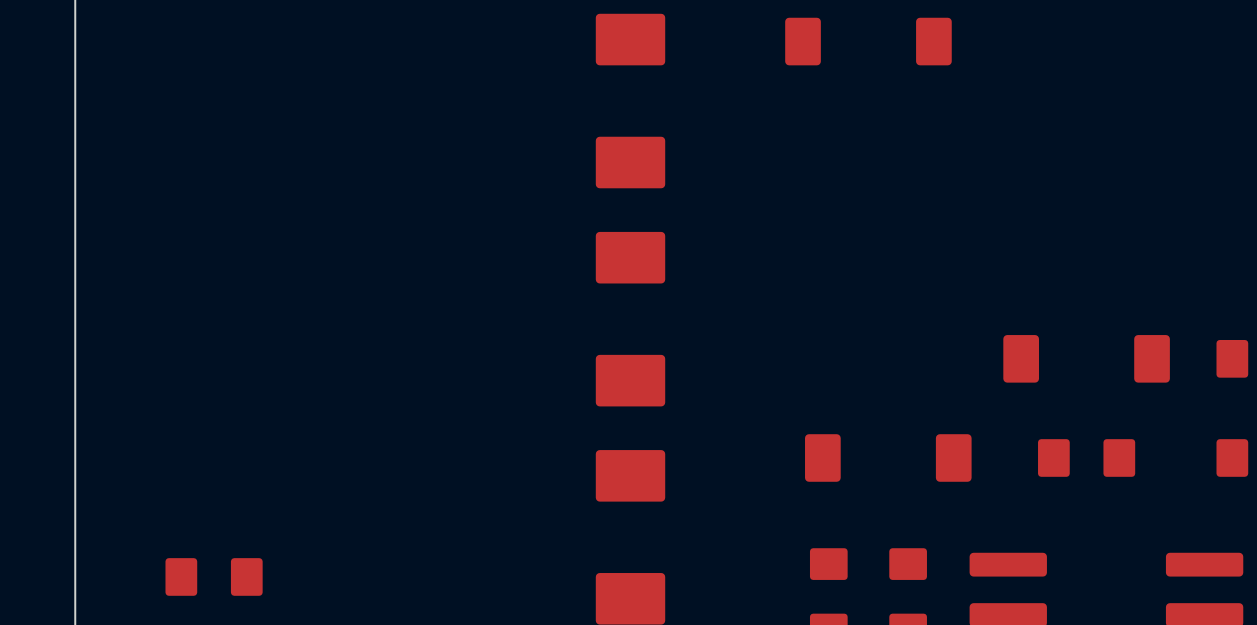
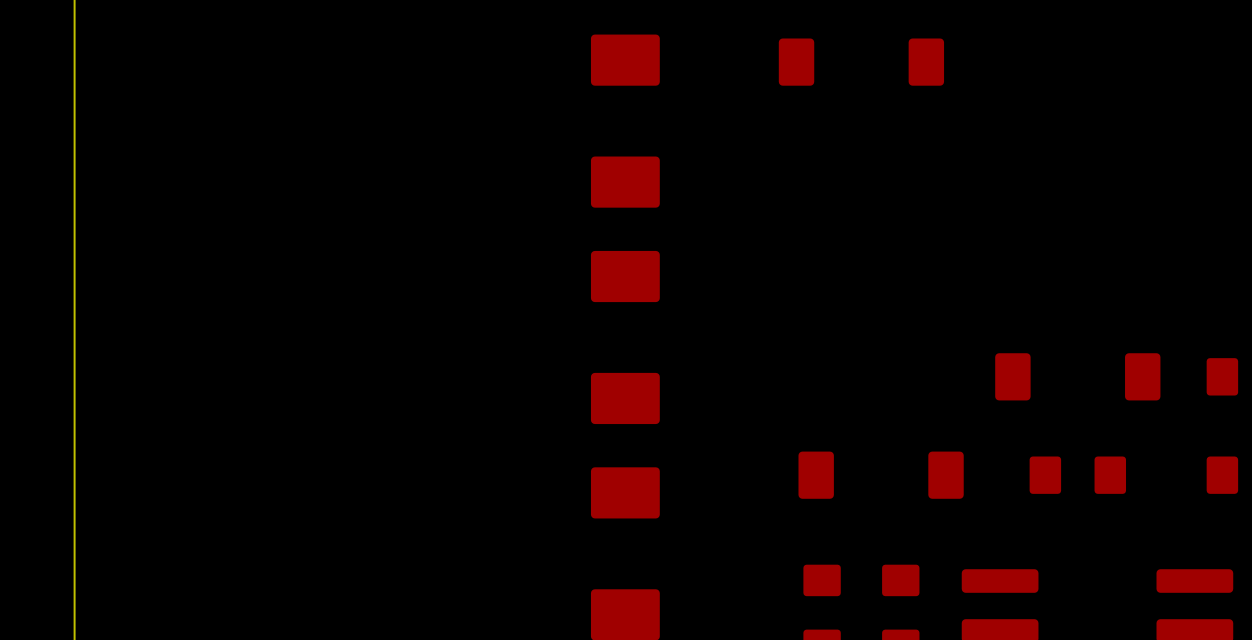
part: (214, 576) -> none

